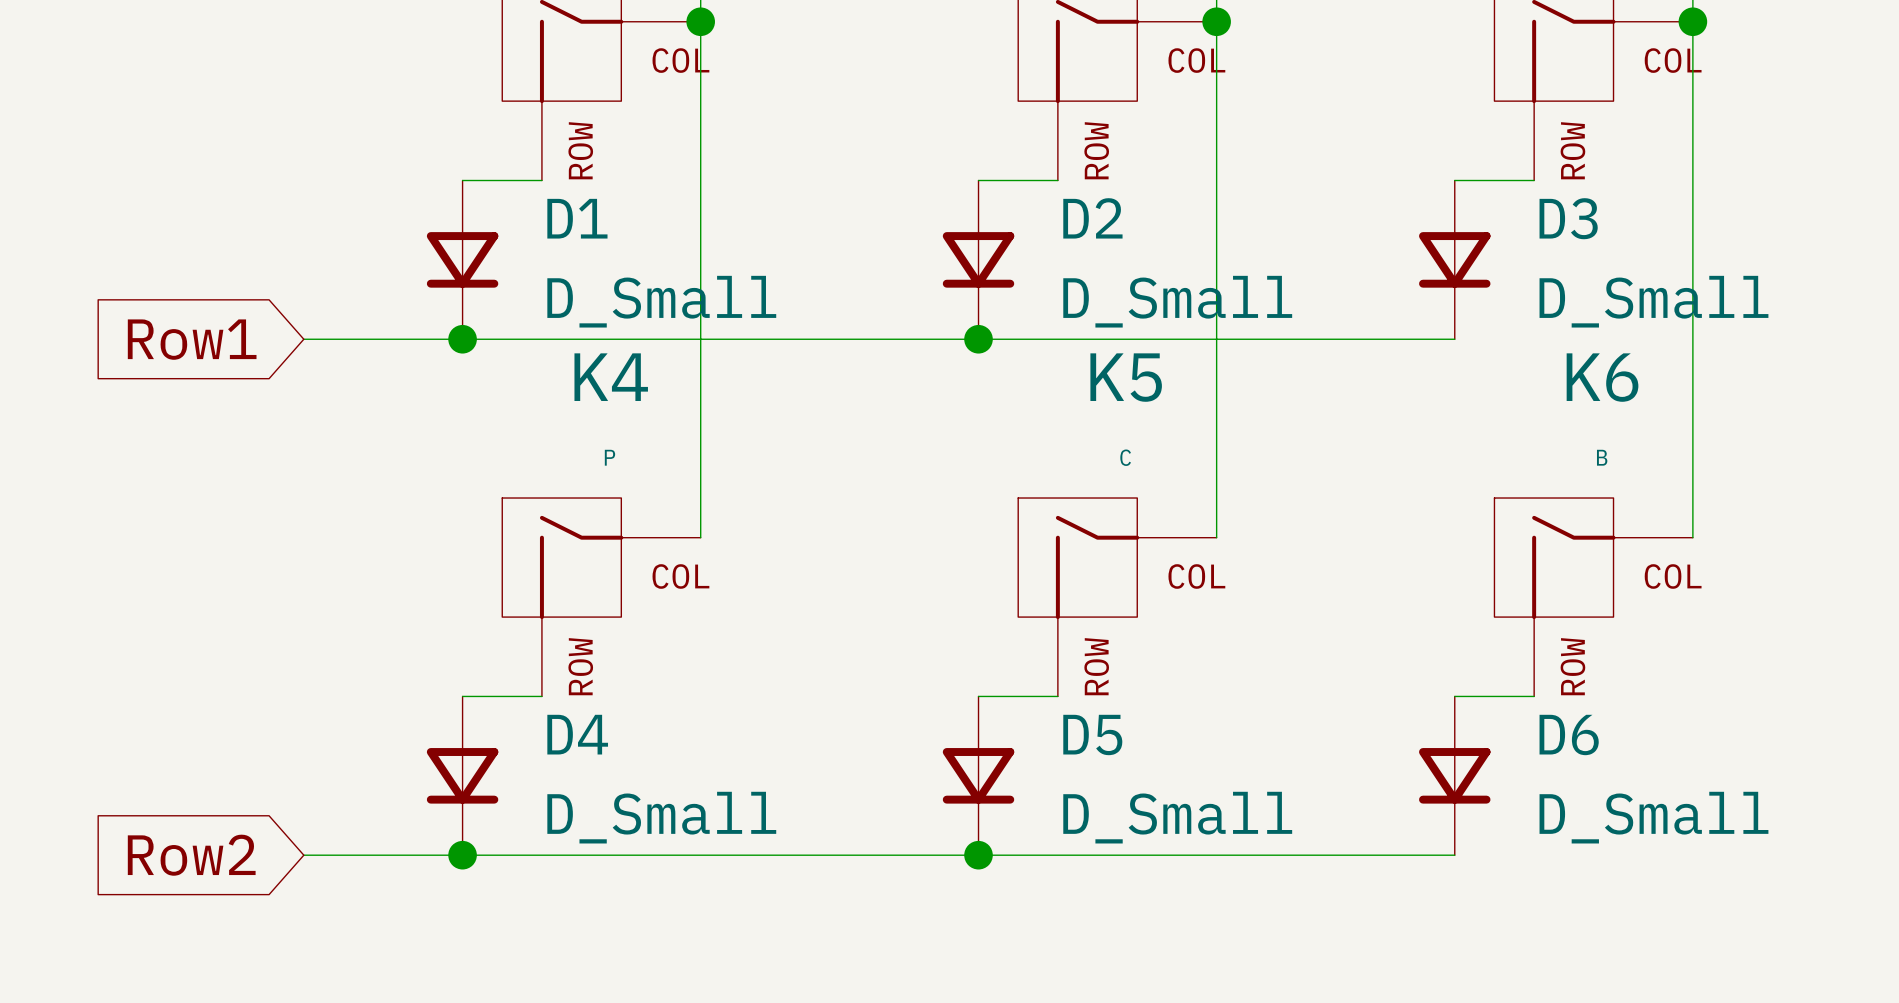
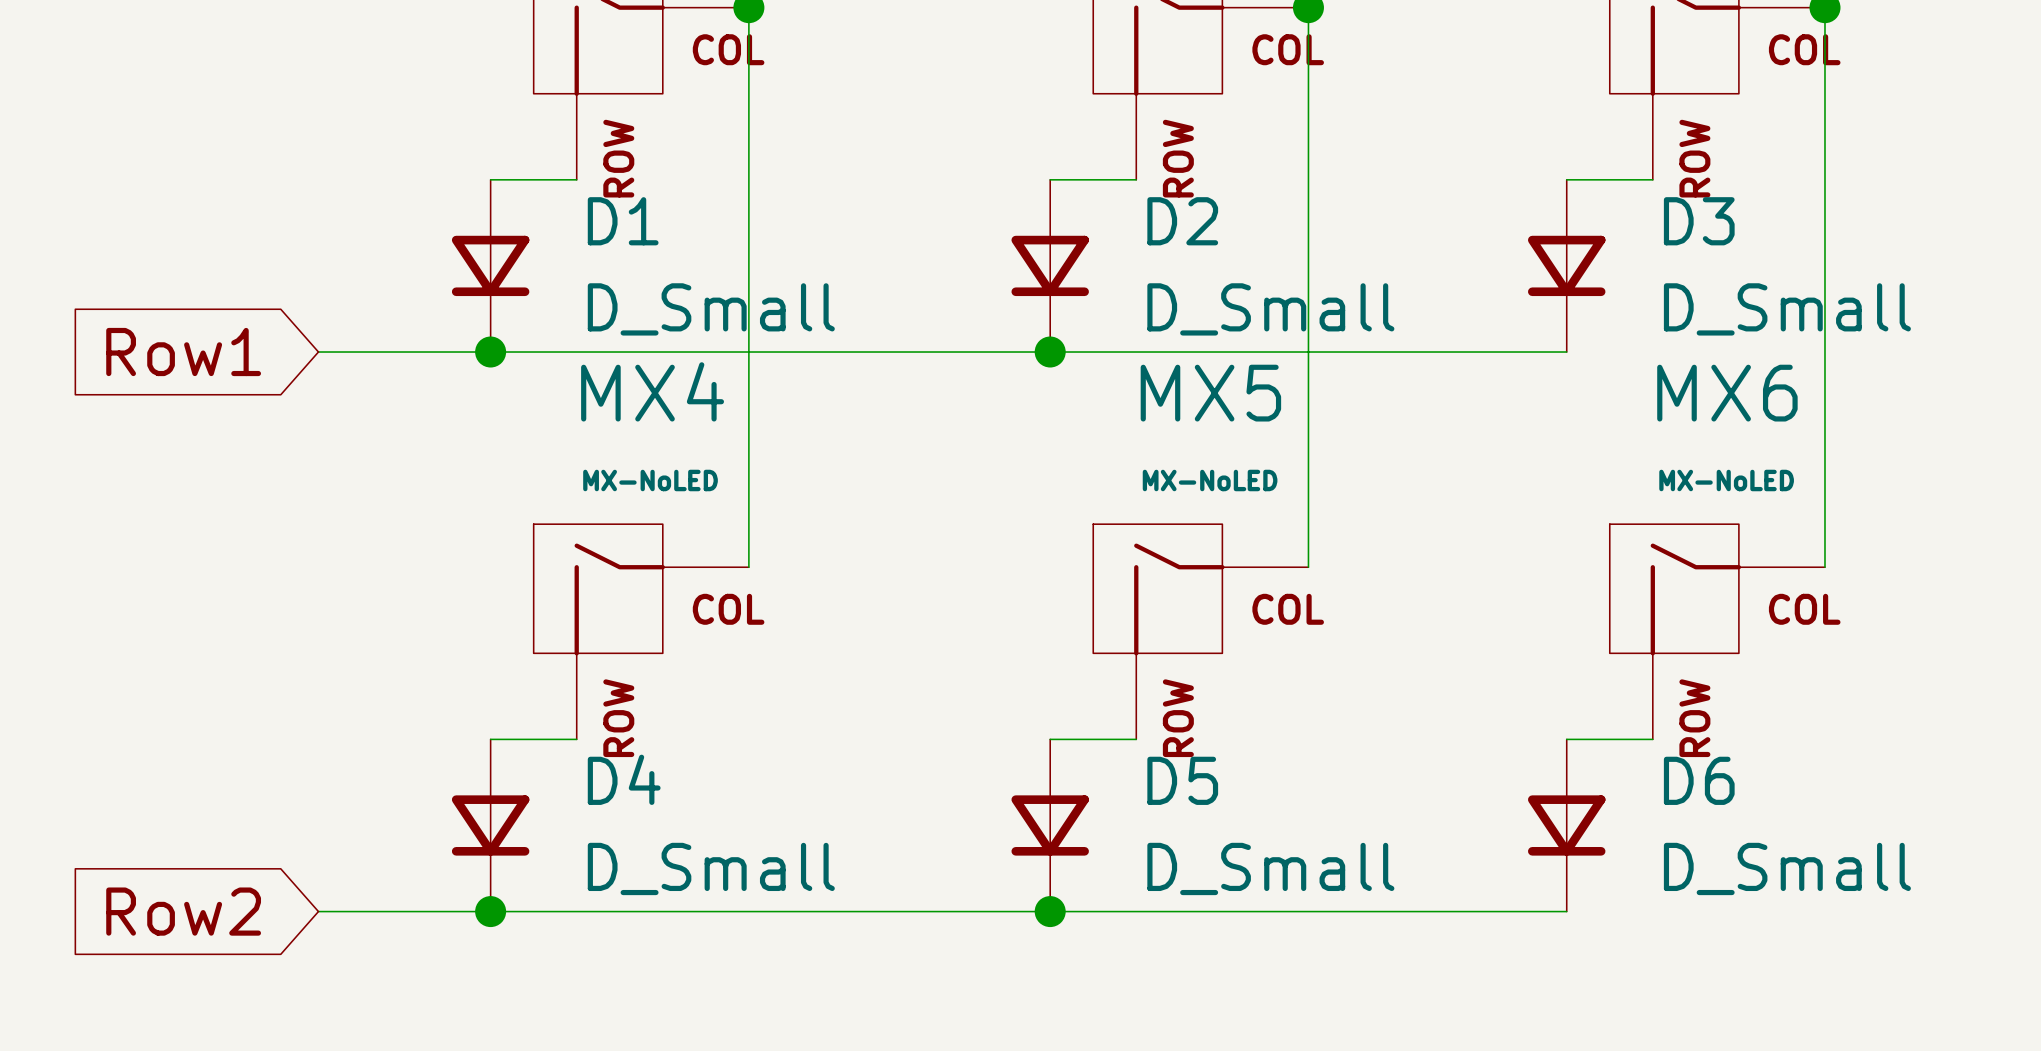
K4 name: K4 (611, 377) -> MX4 (652, 391)
K5 name: K5 (1126, 377) -> MX5 (1210, 393)
K6 name: K6 (1602, 377) -> MX6 (1727, 393)
K4 value: P (609, 457) -> MX-NoLED (650, 480)
K5 value: C (1125, 457) -> MX-NoLED (1210, 480)
K6 value: B (1602, 457) -> MX-NoLED (1726, 480)

